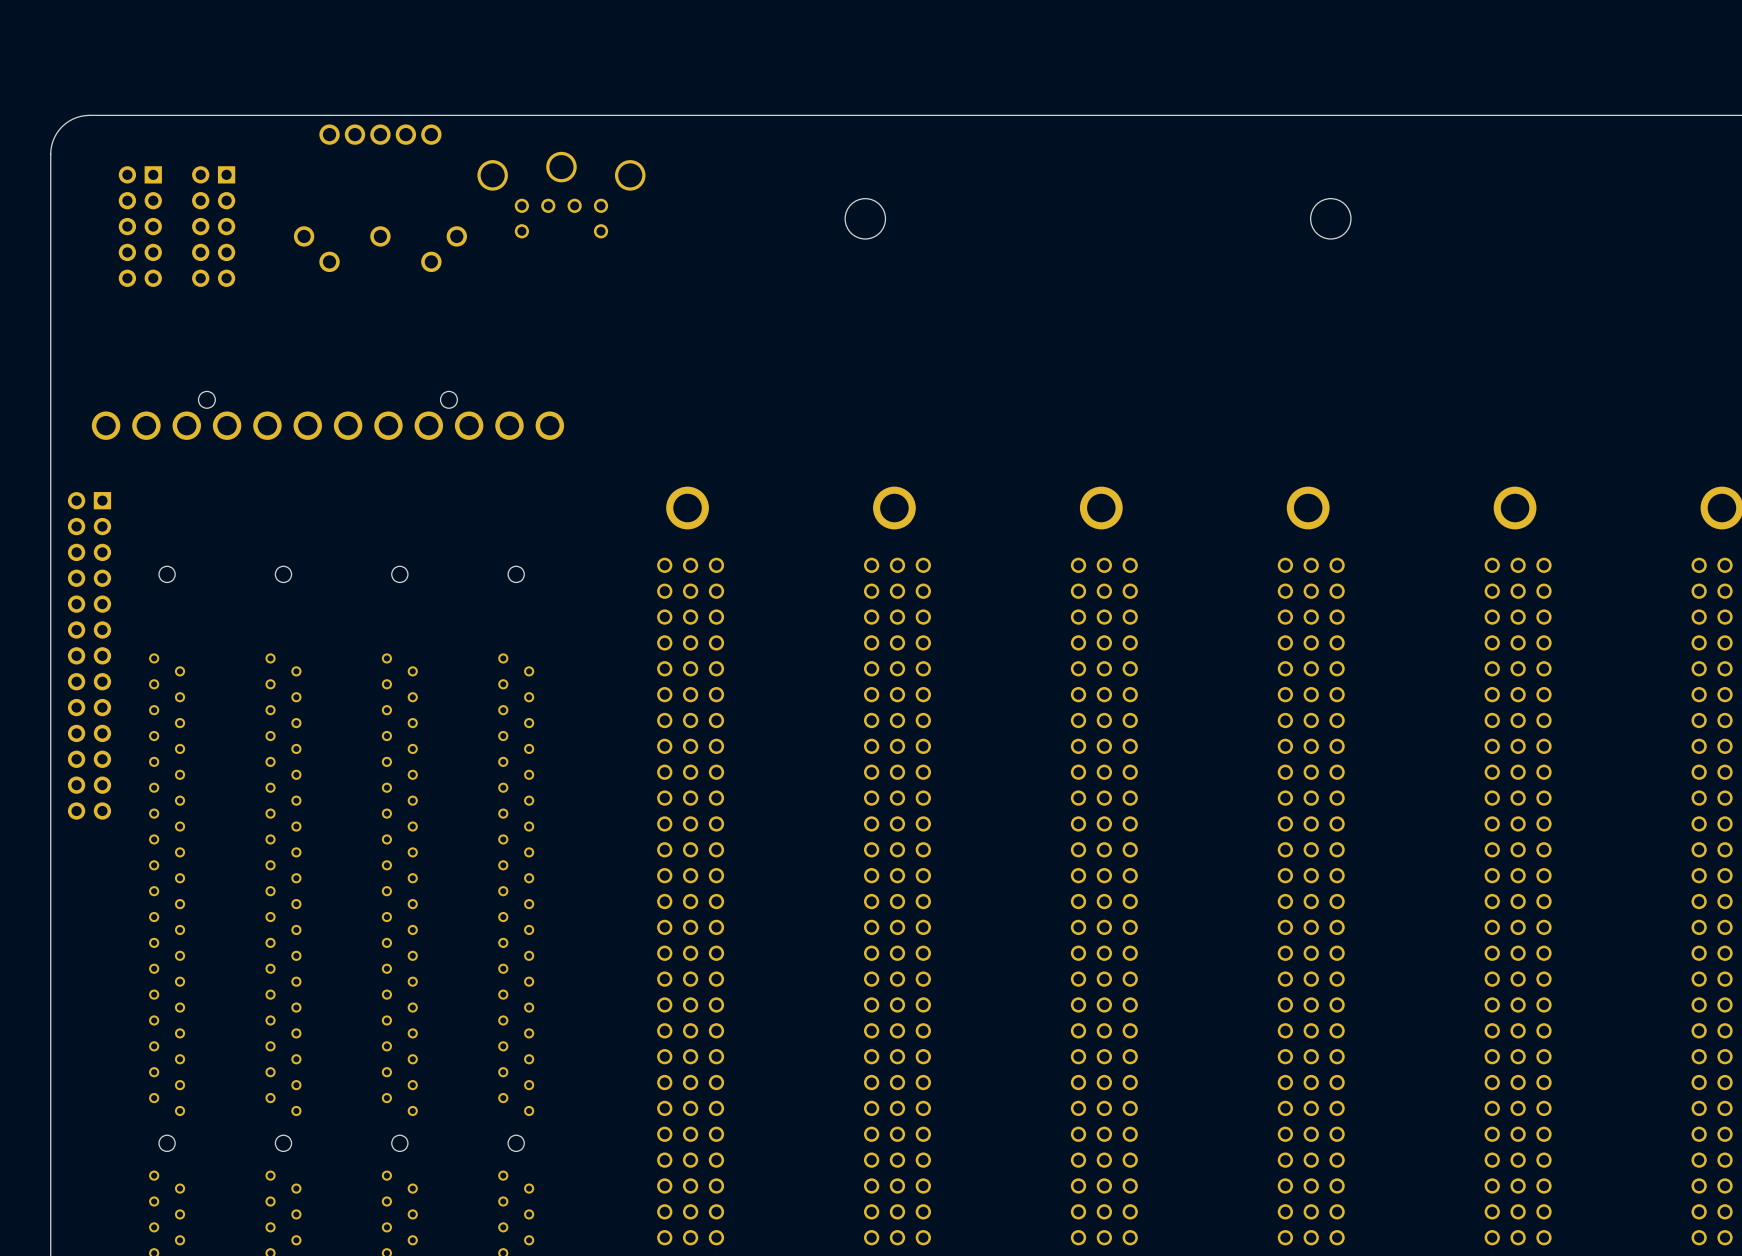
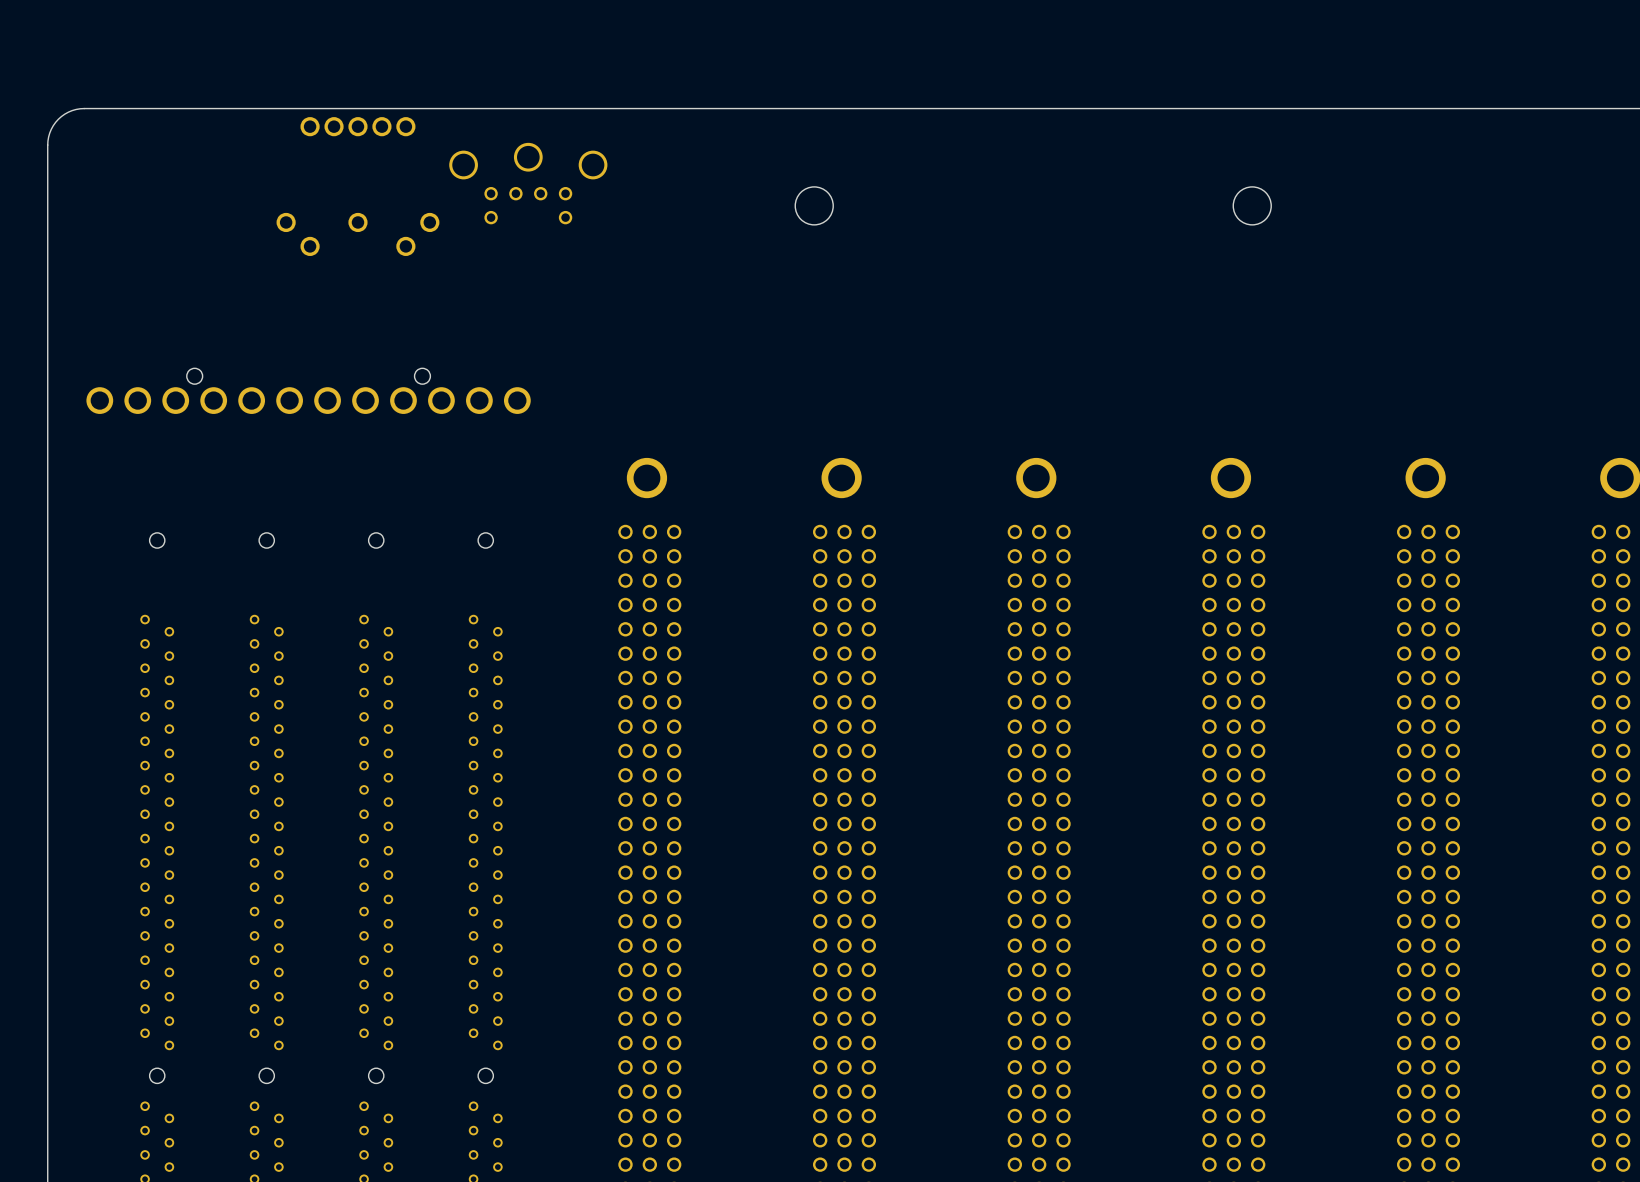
part: (140, 226) -> none
part: (213, 226) -> none
part: (89, 655) -> none

